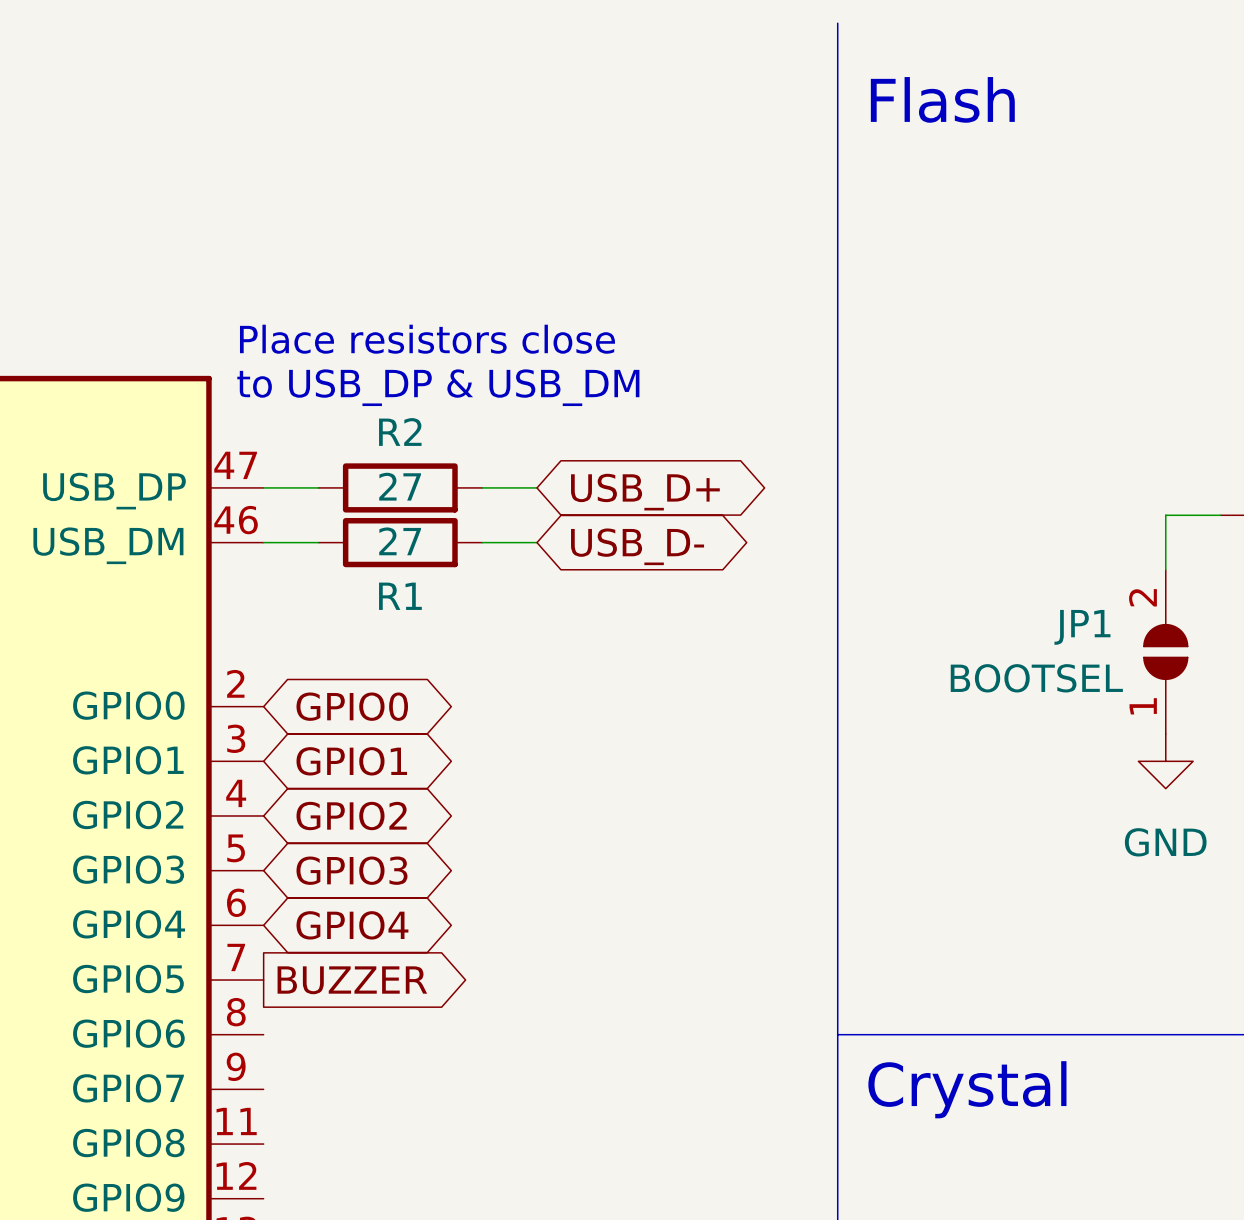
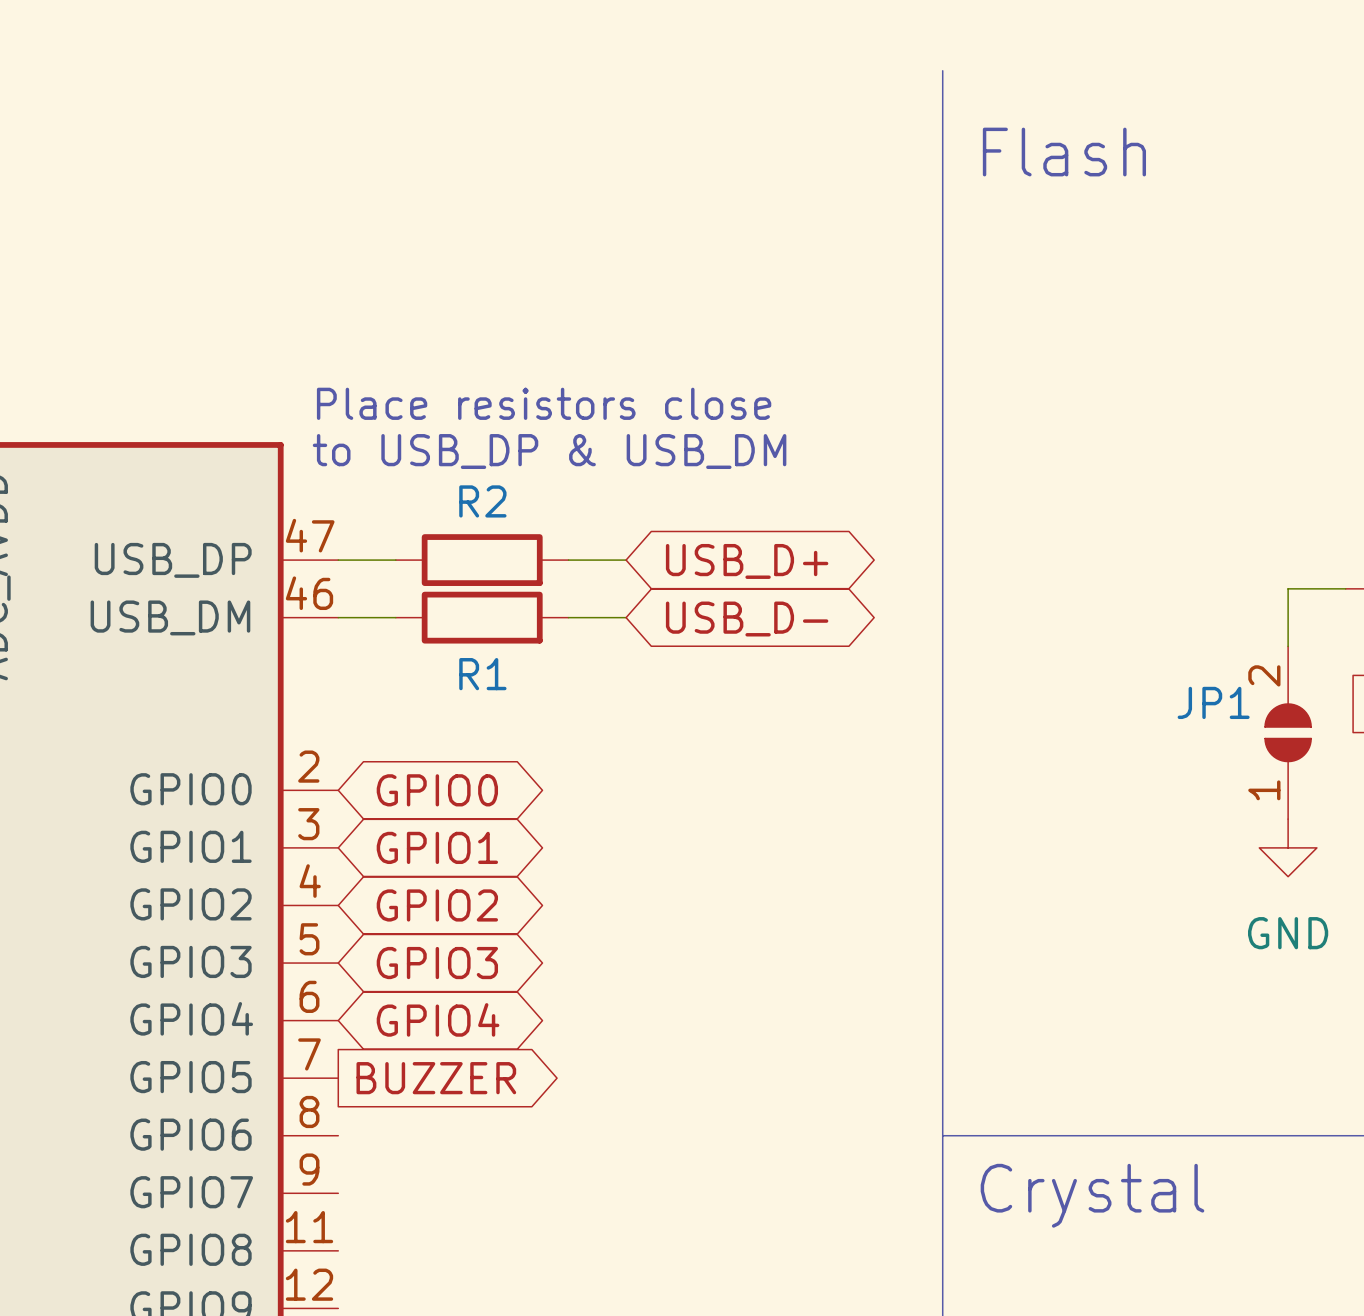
R2 value: 27 (400, 486) -> none
R1 value: 27 (400, 541) -> none
JP1 value: BOOTSEL (1036, 678) -> none

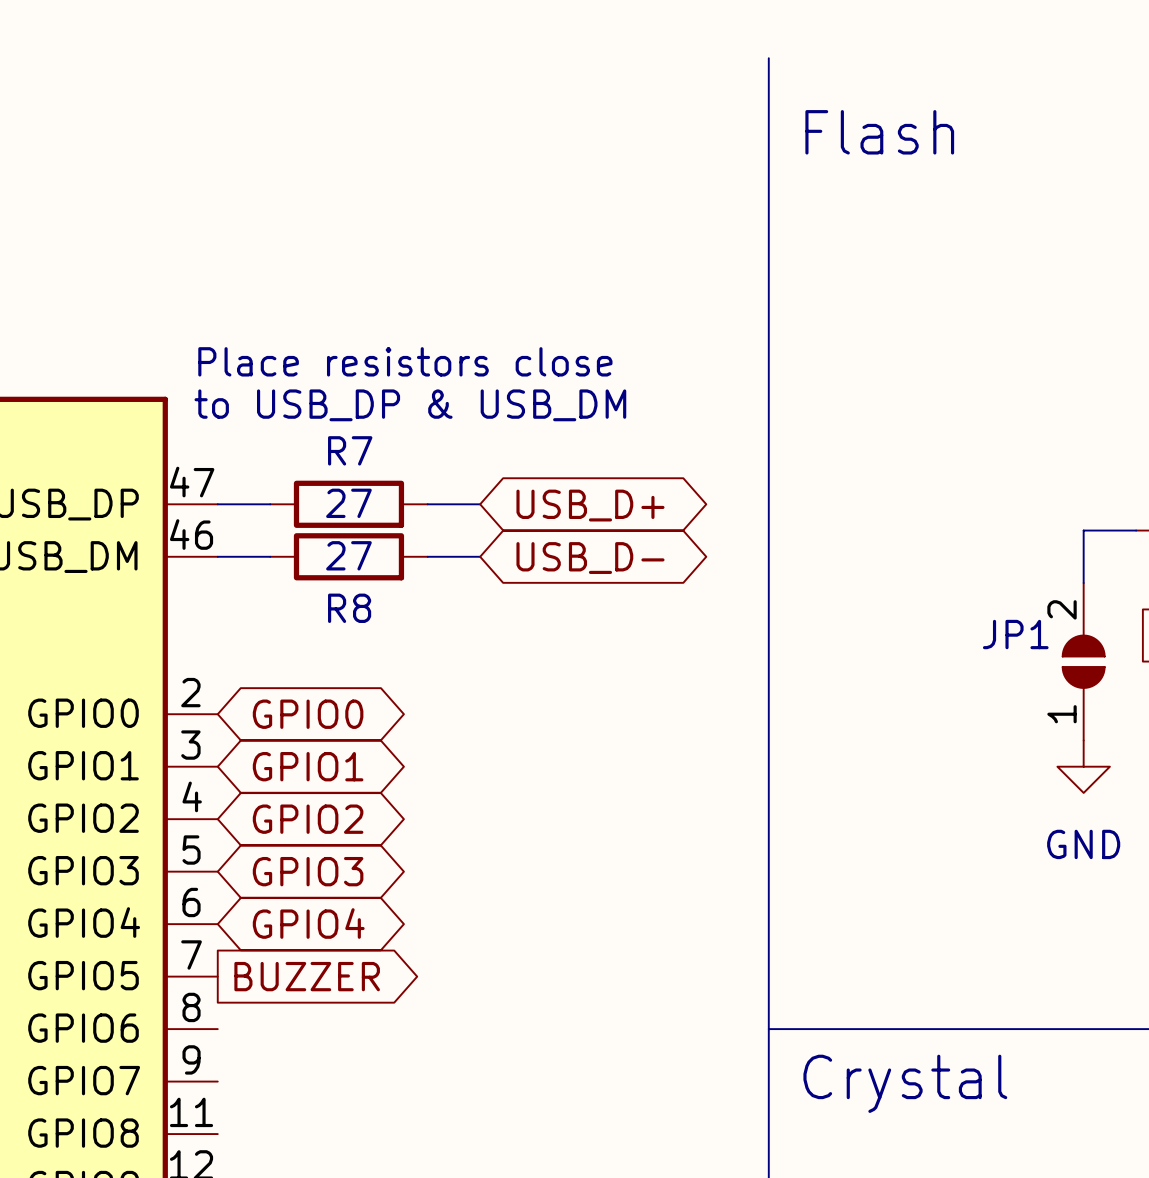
R2 name: R2 (482, 501) -> R7 (350, 450)
R2 value: none -> 27 (348, 503)
R1 value: none -> 27 (348, 555)
R1 name: R1 (482, 674) -> R8 (349, 608)

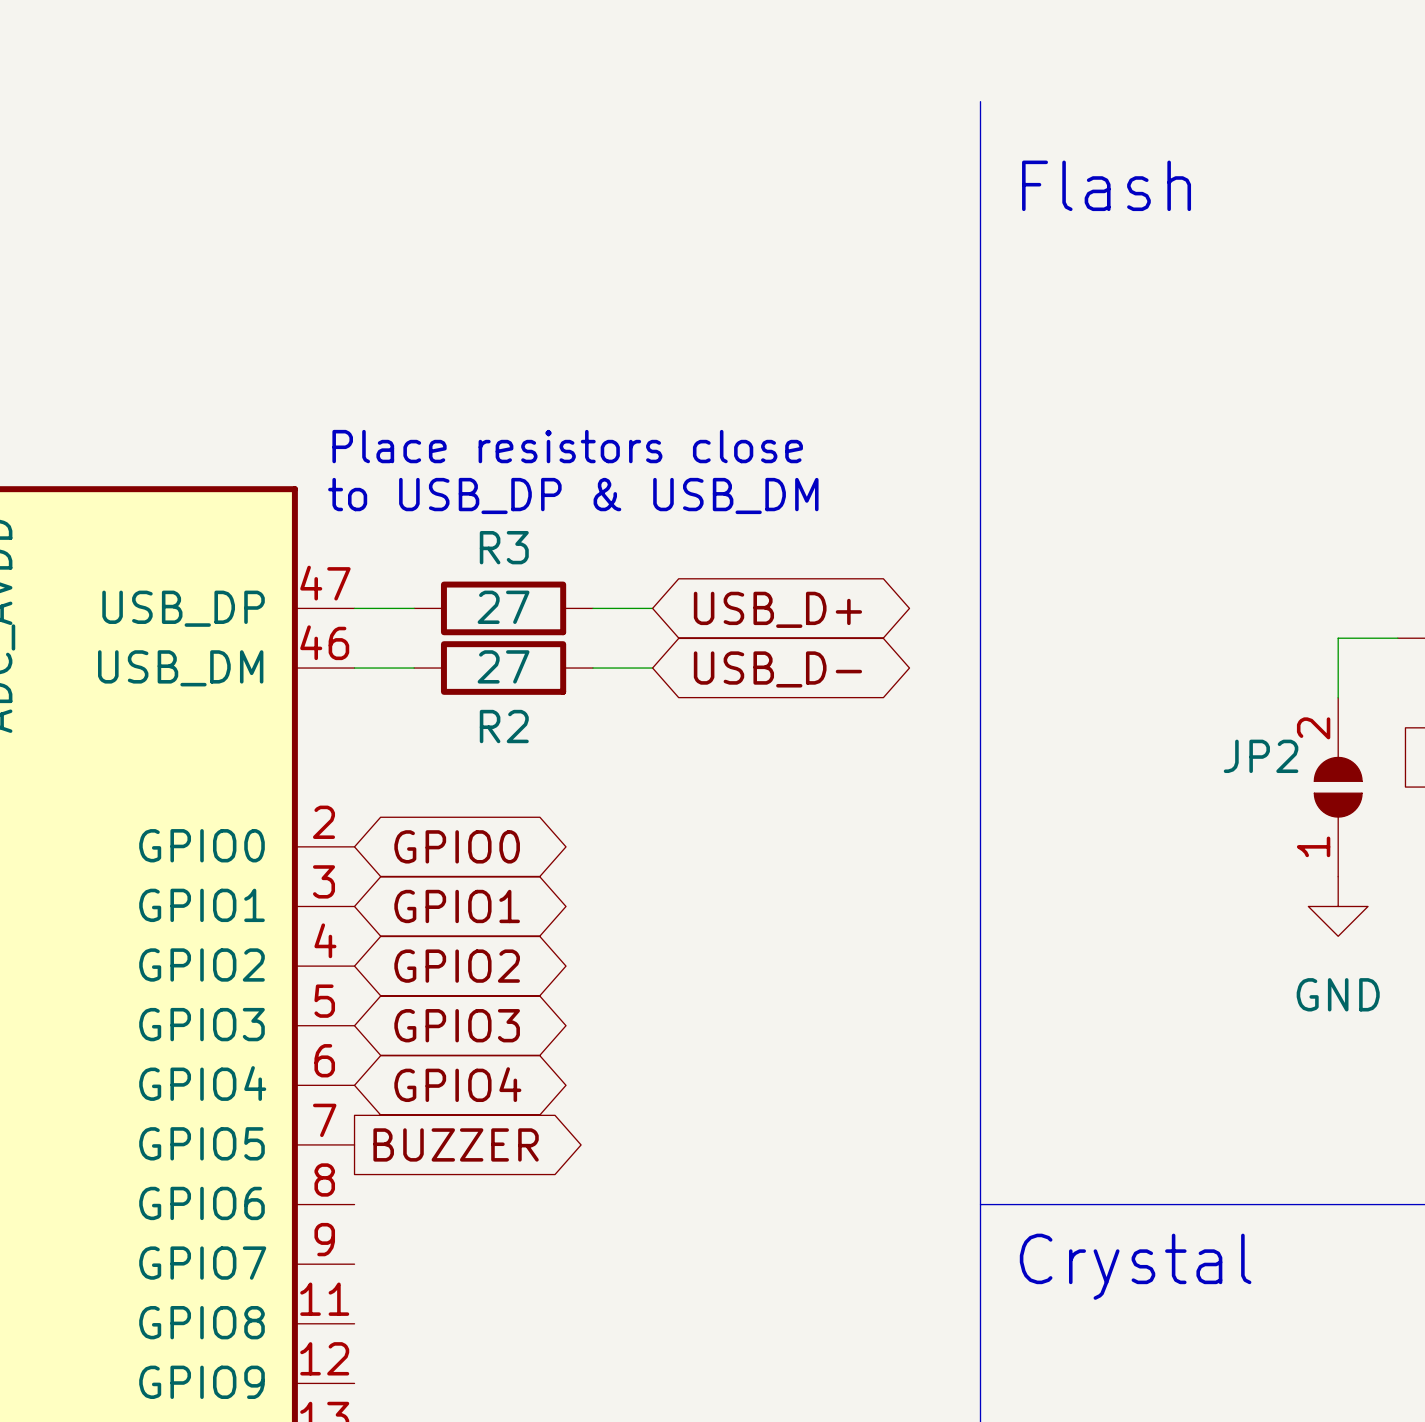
R7 name: R7 (350, 450) -> R3 (504, 547)
R8 name: R8 (349, 608) -> R2 (504, 726)
JP1 name: JP1 (1015, 634) -> JP2 (1261, 756)

